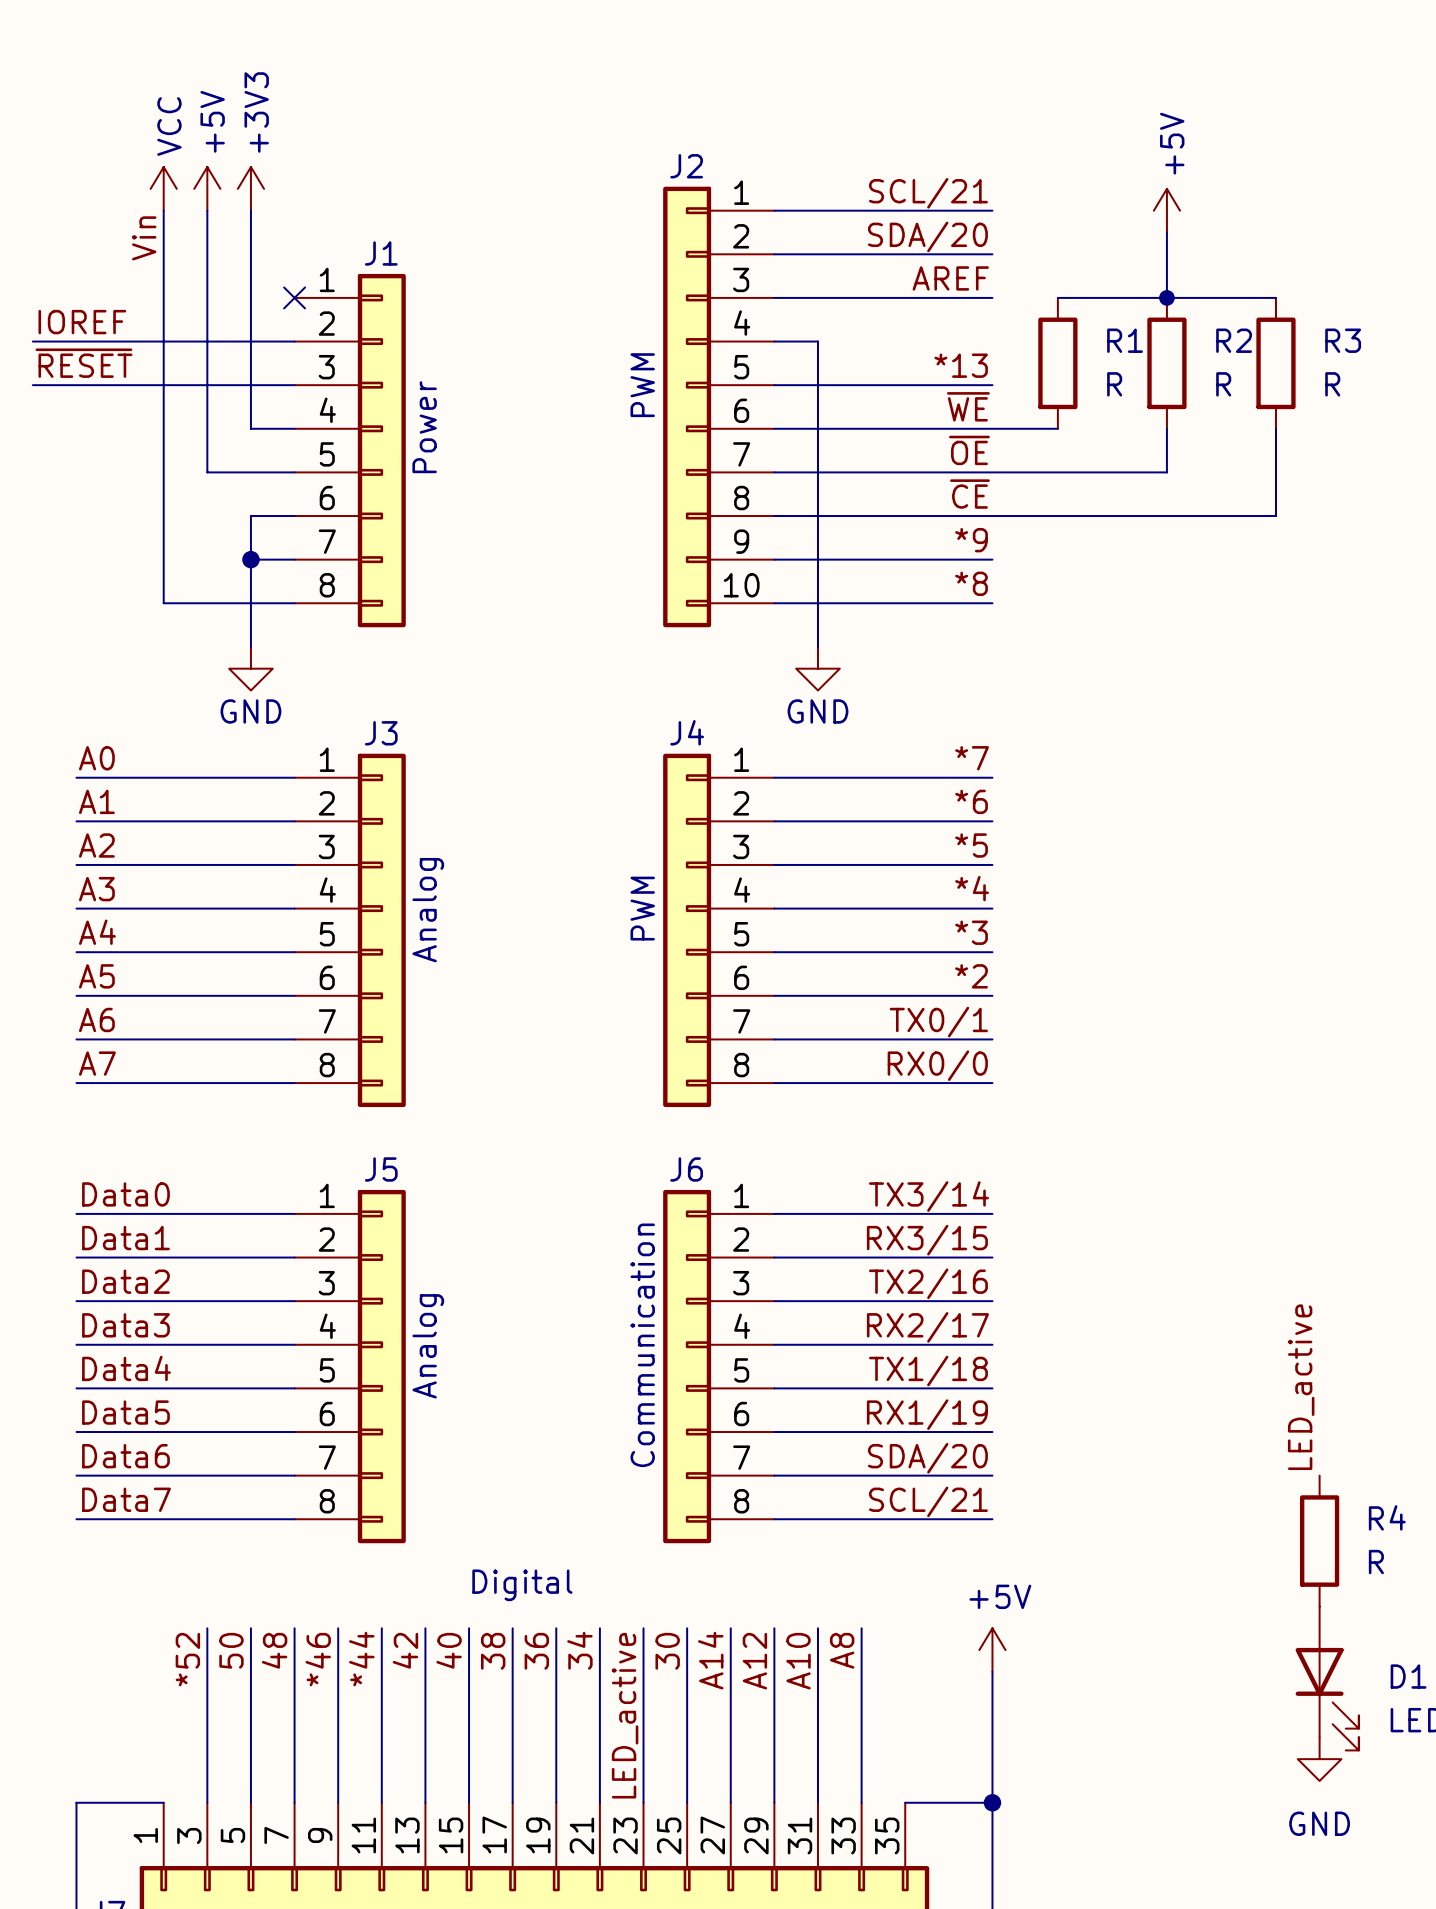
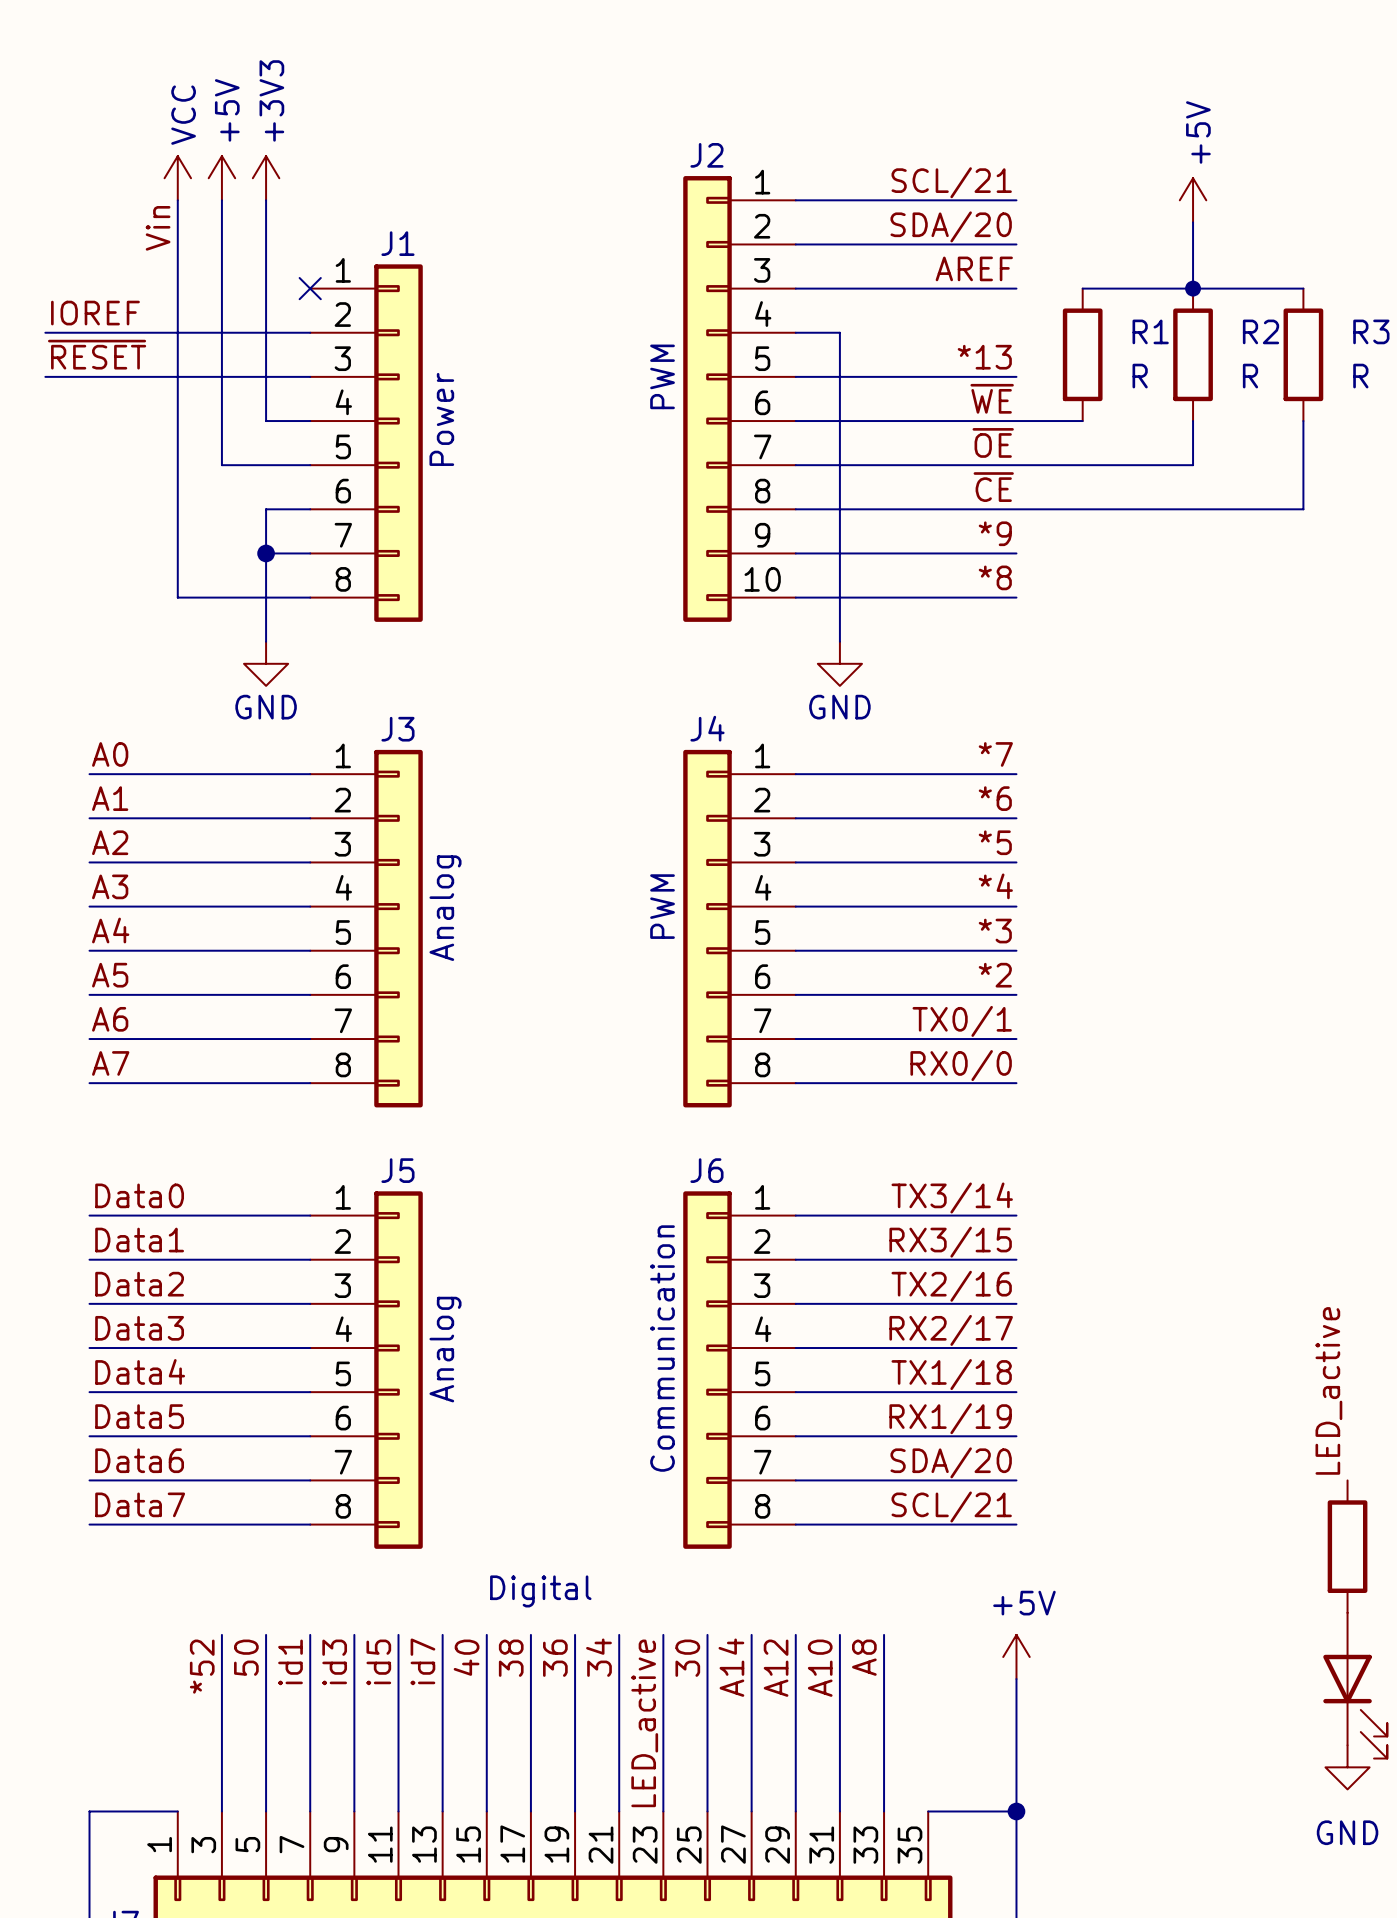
label: 48 (274, 1650) -> id1 (290, 1662)
label: 42 (405, 1650) -> id7 (422, 1661)
label: *46 (318, 1659) -> id3 (334, 1662)
label: *44 (361, 1659) -> id5 (378, 1662)

